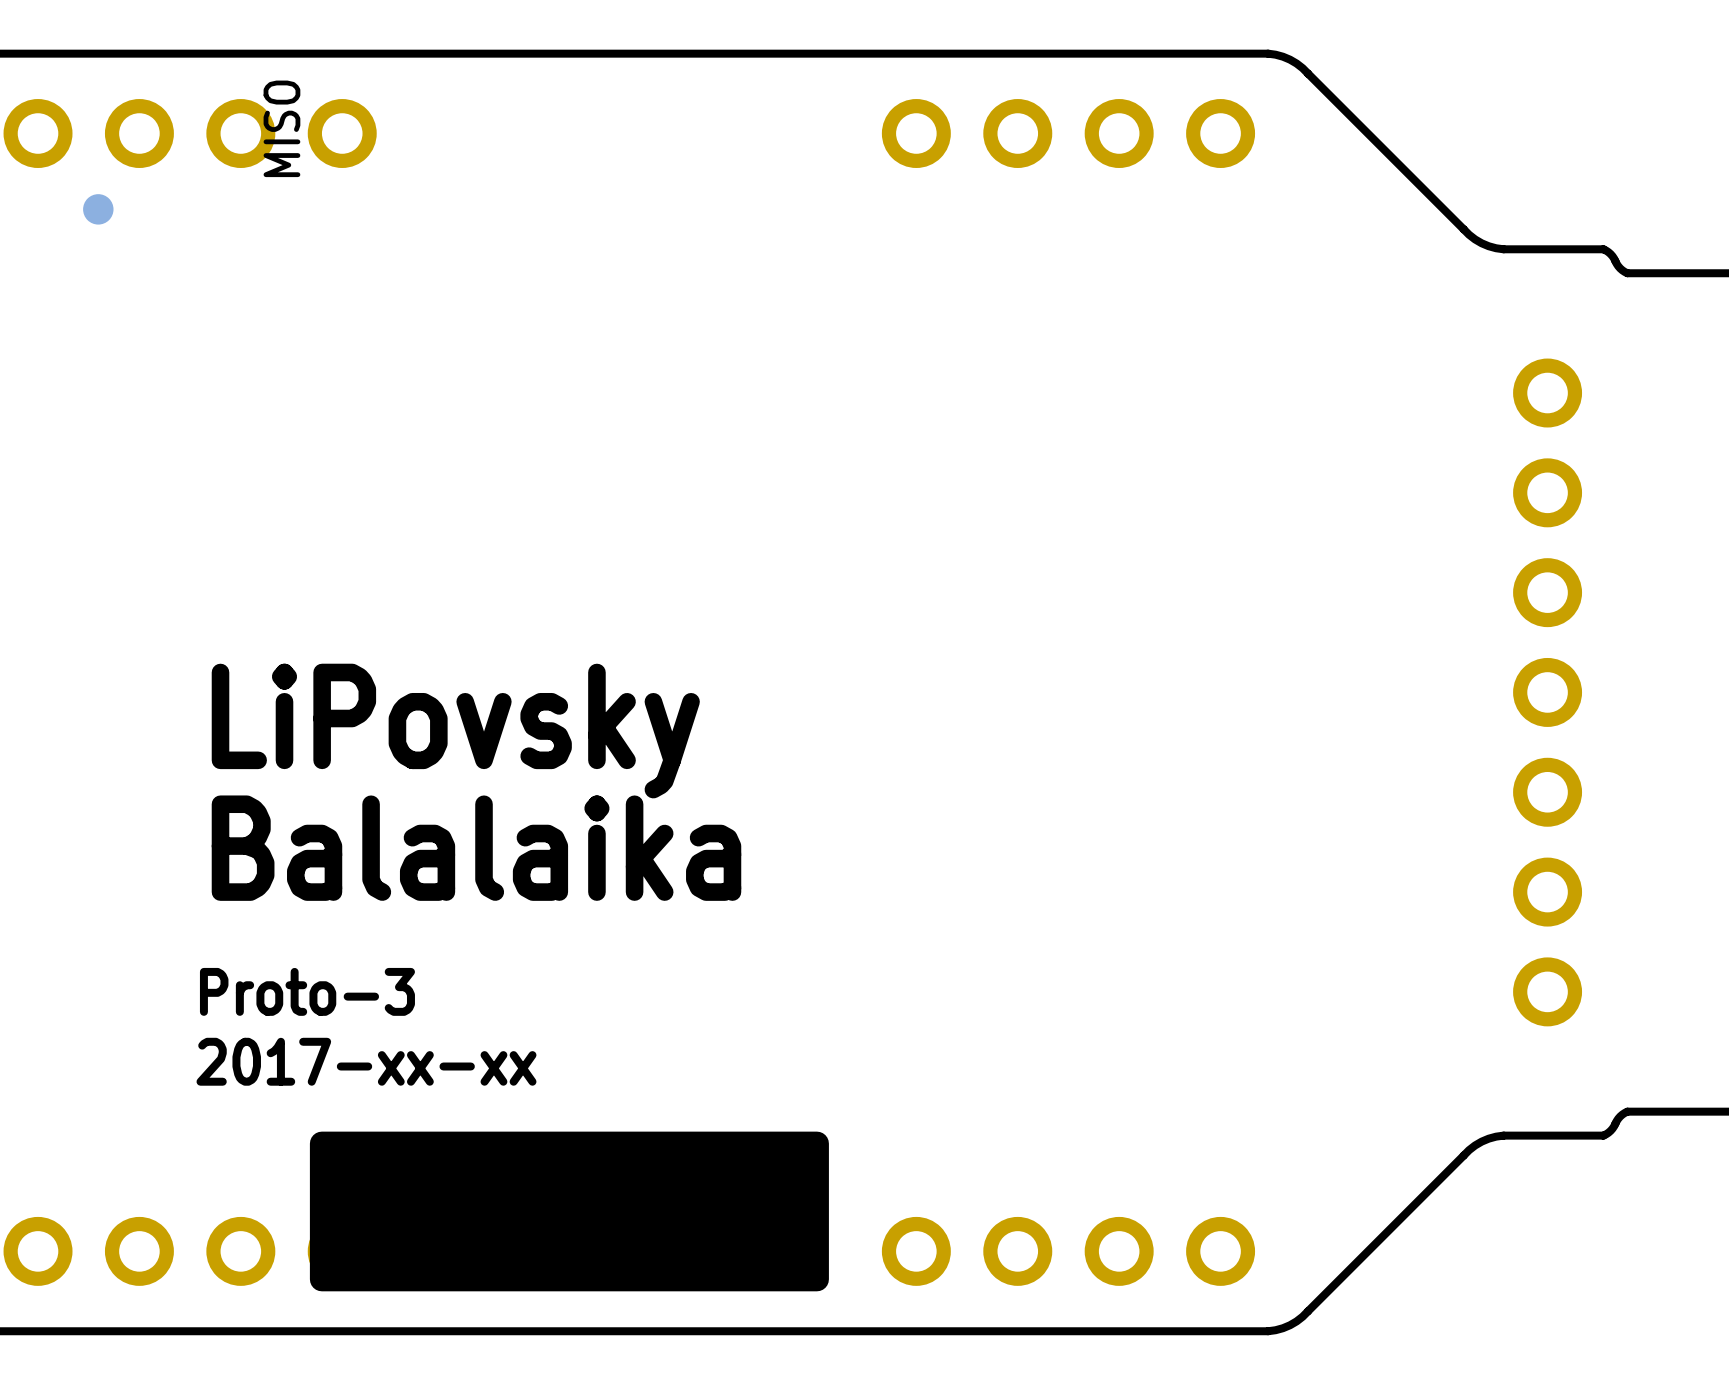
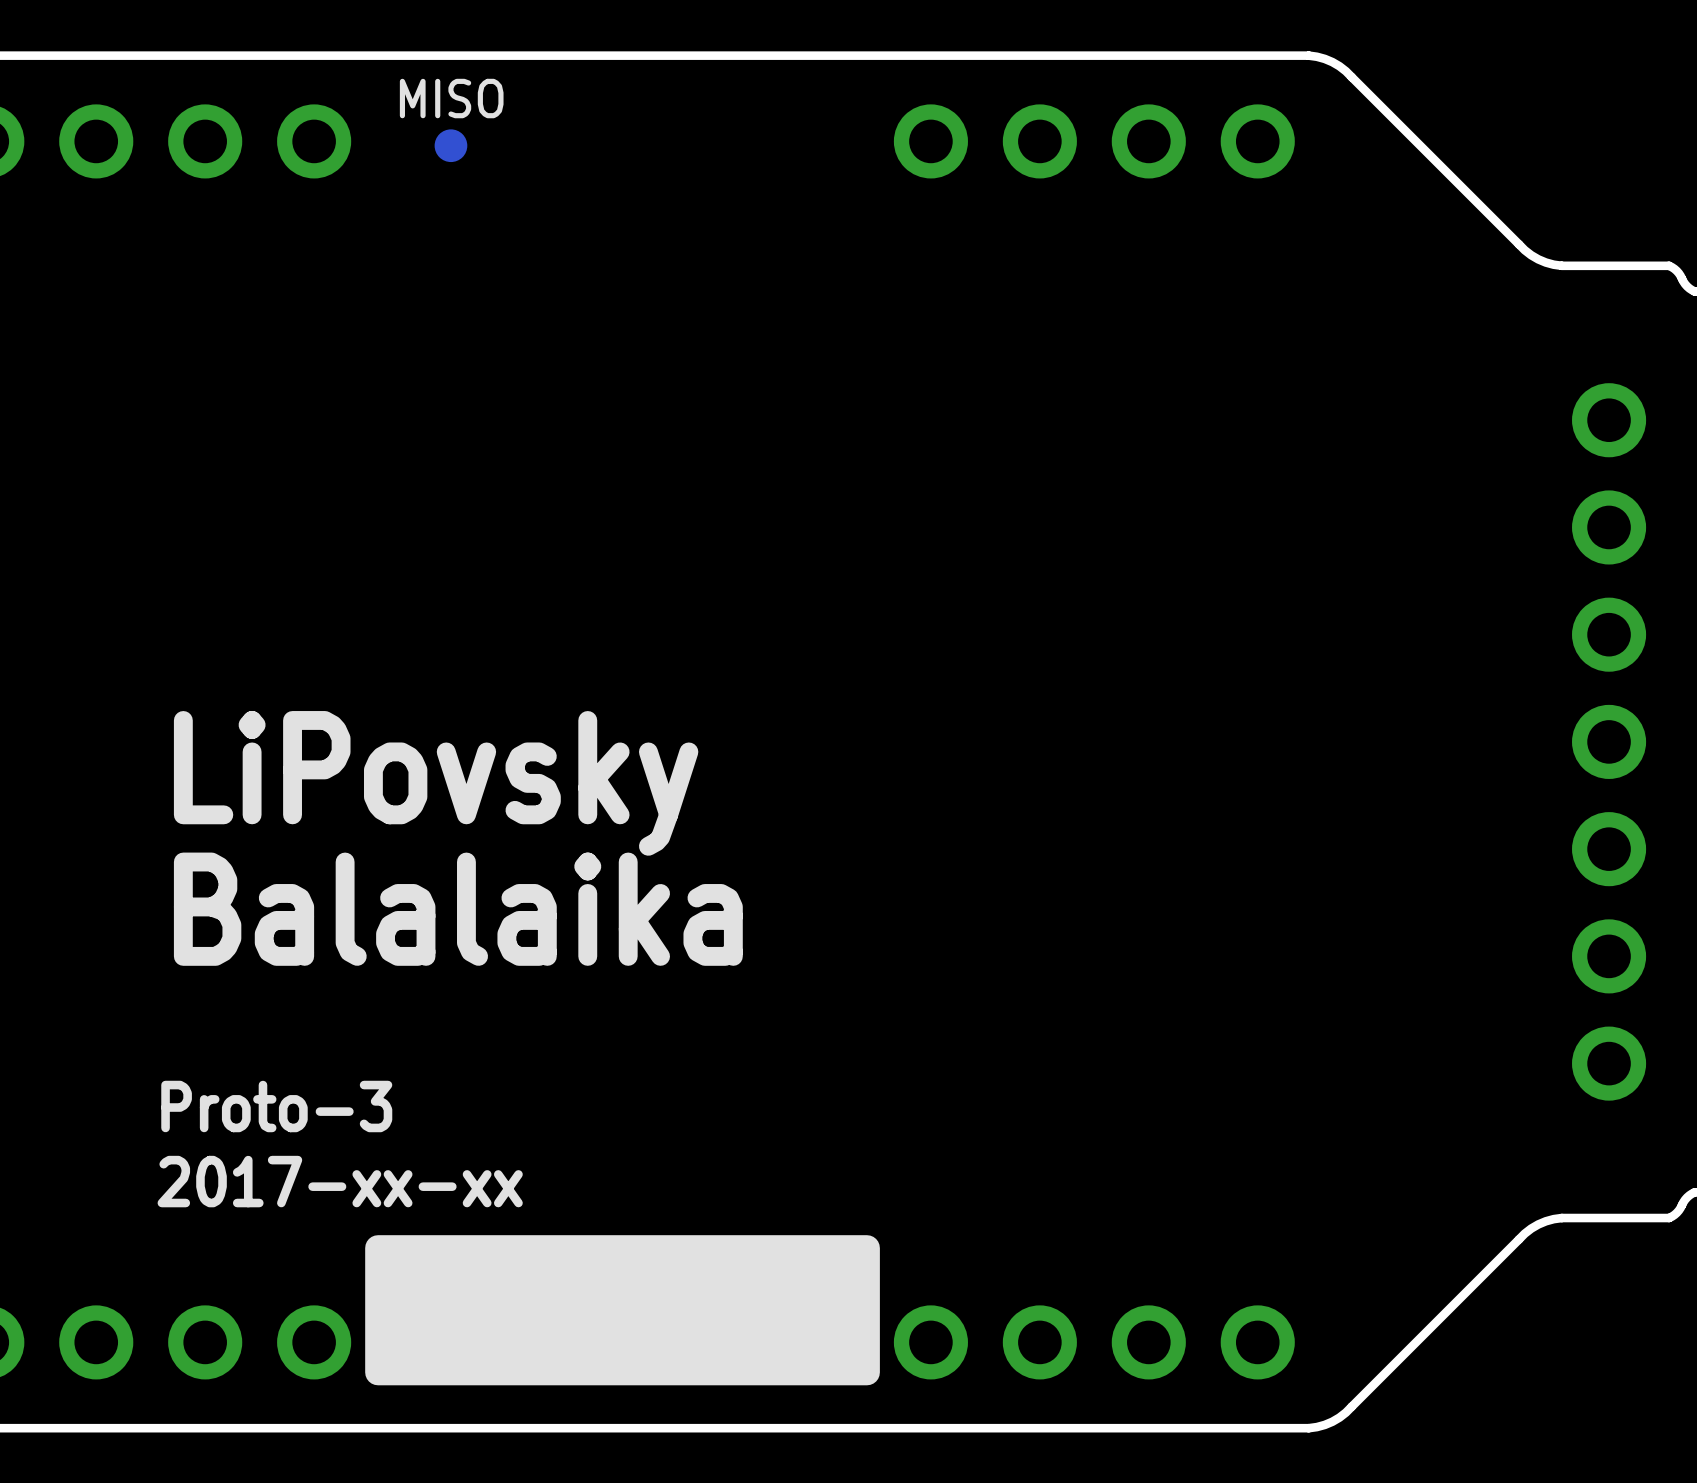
text rotation: 0° (281, 128) -> 90° clockwise (451, 98)
text position: MISO (281, 128) -> MISO (451, 98)
part position: (98, 209) -> (450, 145)
text position: Proto-3 (307, 991) -> Proto-3 (276, 1106)
text position: 2017-xx-xx (366, 1061) -> 2017-xx-xx (340, 1181)
drawing: [309, 1131, 829, 1292] -> none
drawing: none -> [365, 1235, 880, 1386]

